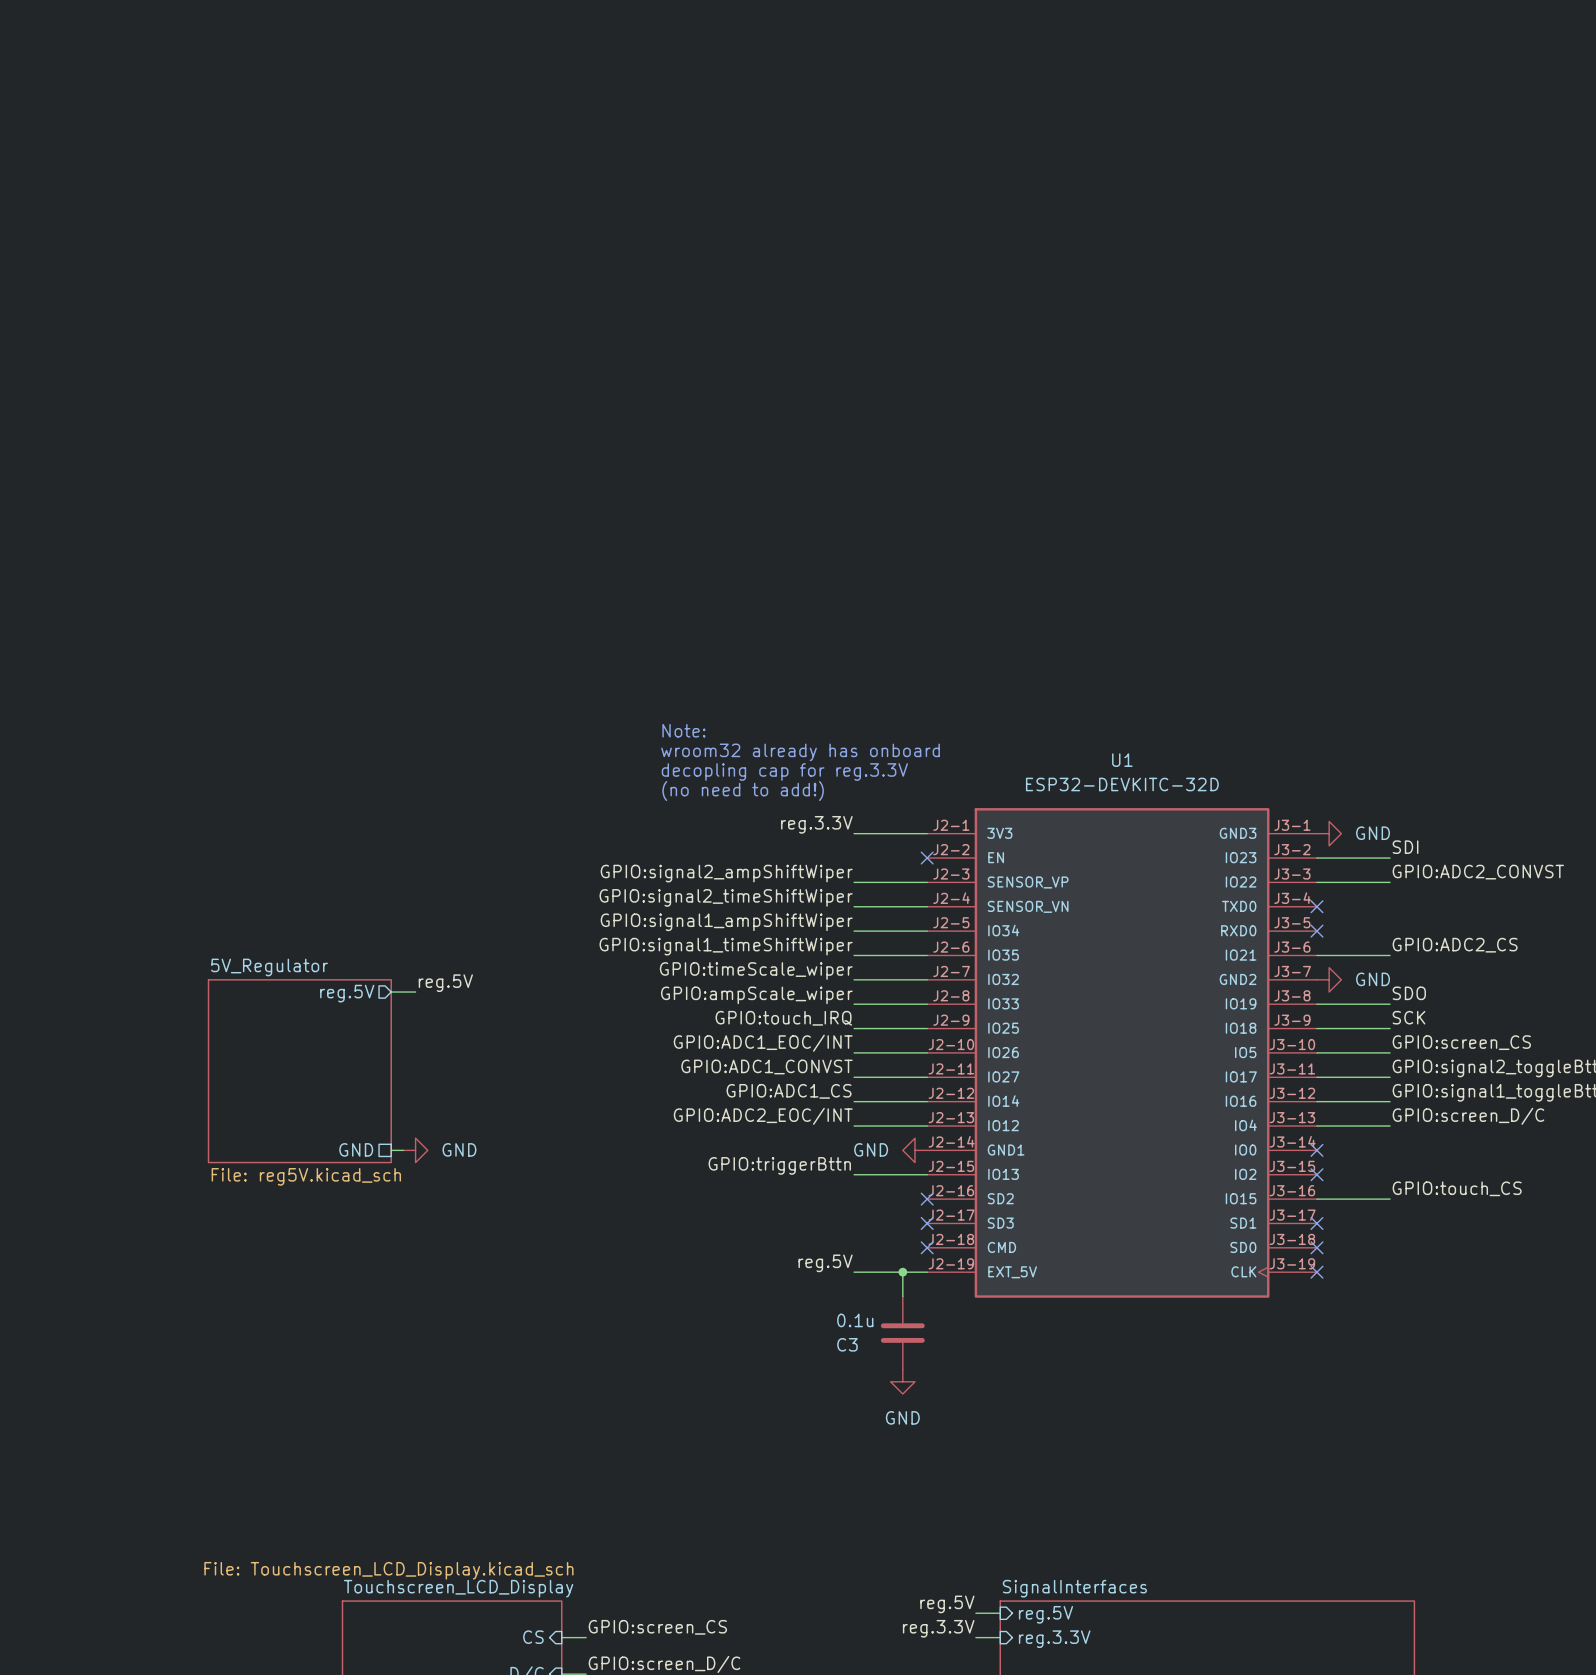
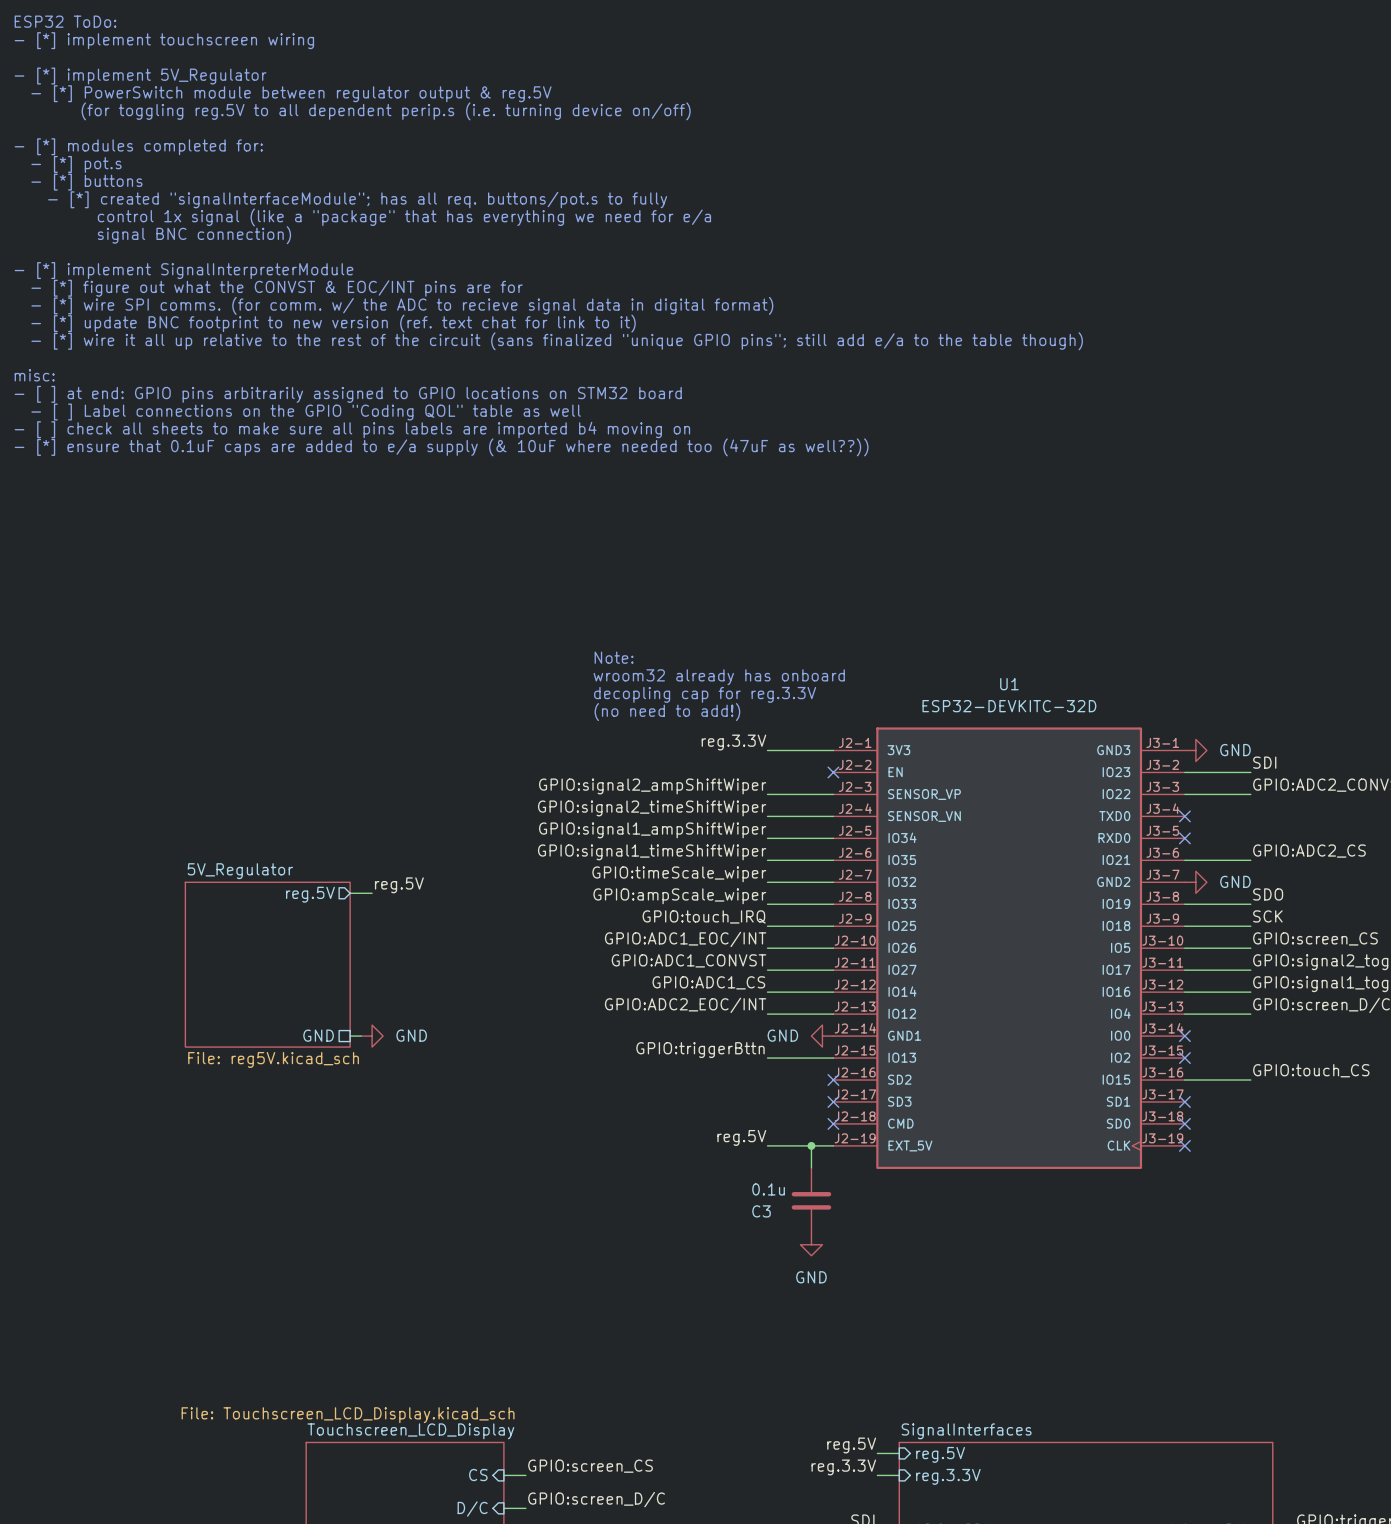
text: none -> ESP32 ToDo: (65, 21)
text: none -> - [*] implement touchscreen wiring (164, 40)
text: none -> - [*] implement 5V_Regulator (140, 76)
text: none -> - [*] PowerSwitch module between regulator output & reg.5V (291, 93)
text: none -> (for toggling reg.5V to all dependent perip.s (i.e. turning device on/off) (386, 111)
text: none -> - [*] modules completed for: (138, 146)
text: none -> - [*] pot.s (76, 164)
text: none -> - [*] buttons (86, 182)
text: none -> - [*] created "signalInterfaceModule"; has all req. buttons/pot.s to fully (357, 199)
text: none -> control 1x signal (like a "package" that has everything we need for e/a (404, 217)
text: none -> signal BNC connection) (194, 235)
text: none -> - [*] implement SignalInterpreterModule (183, 270)
text: none -> - [*] figure out what the CONVST & EOC/INT pins are for (277, 288)
text: none -> - [*] wire SPI comms. (for comm. w/ the ADC to recieve signal data in digital format) (402, 305)
text: none -> - [*] update BNC footprint to new version (ref. text chat for link to it) (333, 323)
text: none -> - [*] wire it all up relative to the rest of the circuit (sans finalized "unique GPIO pins"; still add e/a to the table though) (557, 341)
text: none -> misc: (34, 375)
text: none -> - [ ] at end: GPIO pins arbitrarily assigned to GPIO locations on STM32 board (348, 394)
text: none -> - [ ] Label connections on the GPIO "Coding QOL" table as well (306, 412)
text: none -> - [ ] check all sheets to make sure all pins labels are imported b4 moving on (352, 429)
text: none -> - [*] ensure that 0.1uF caps are added to e/a supply (& 10uF where needed too (47uF as well??)) (441, 447)

